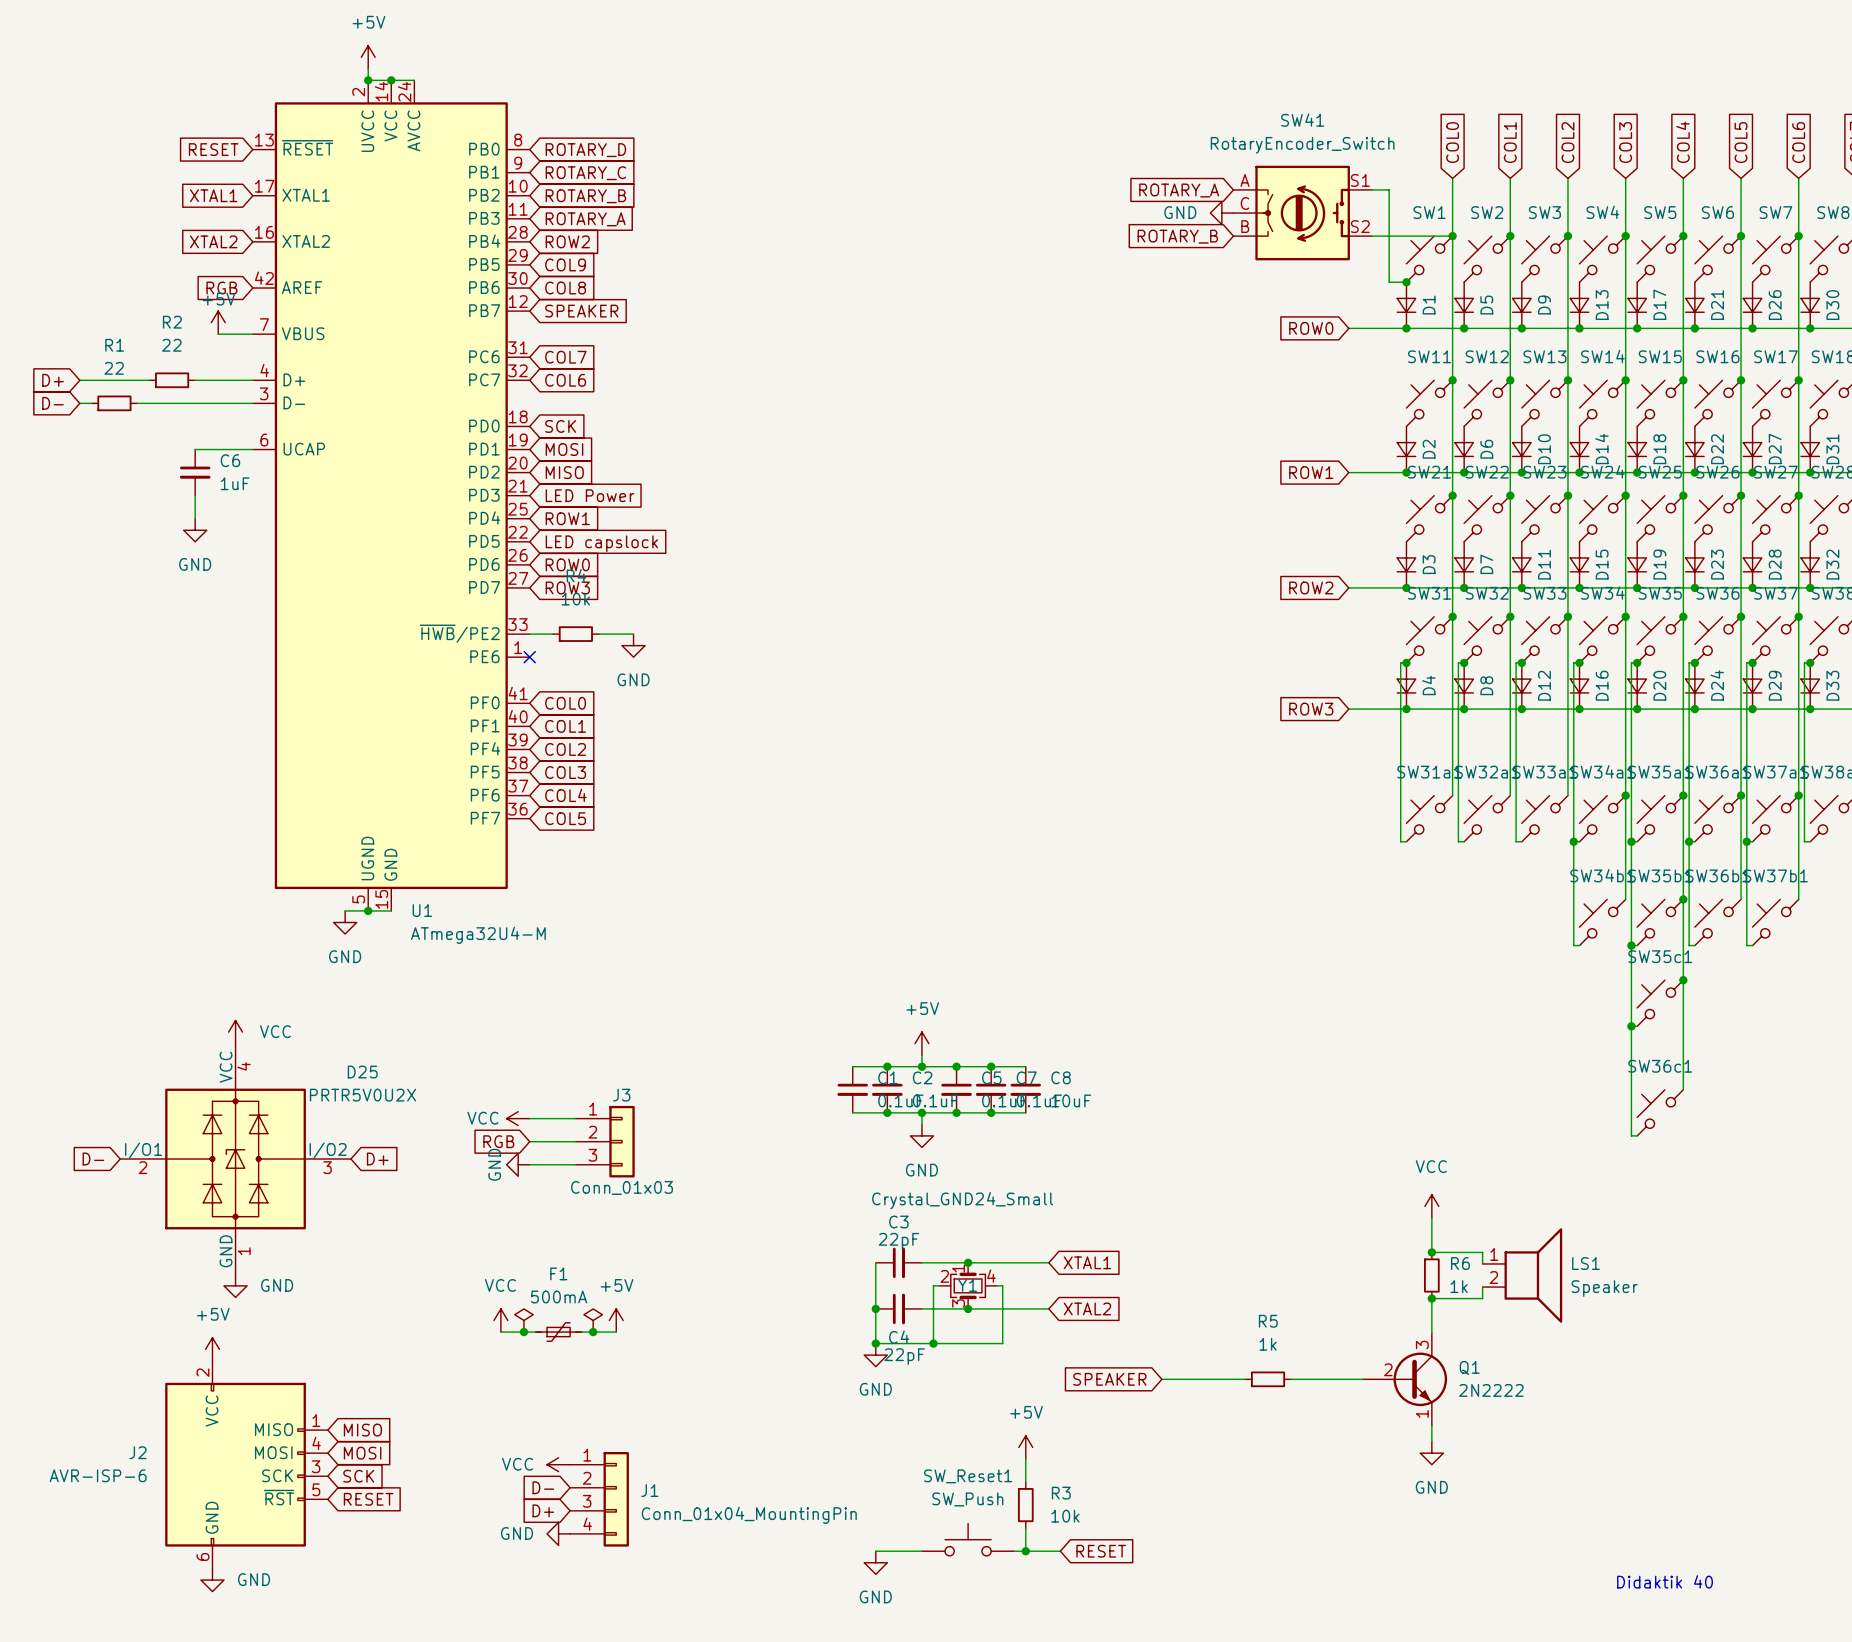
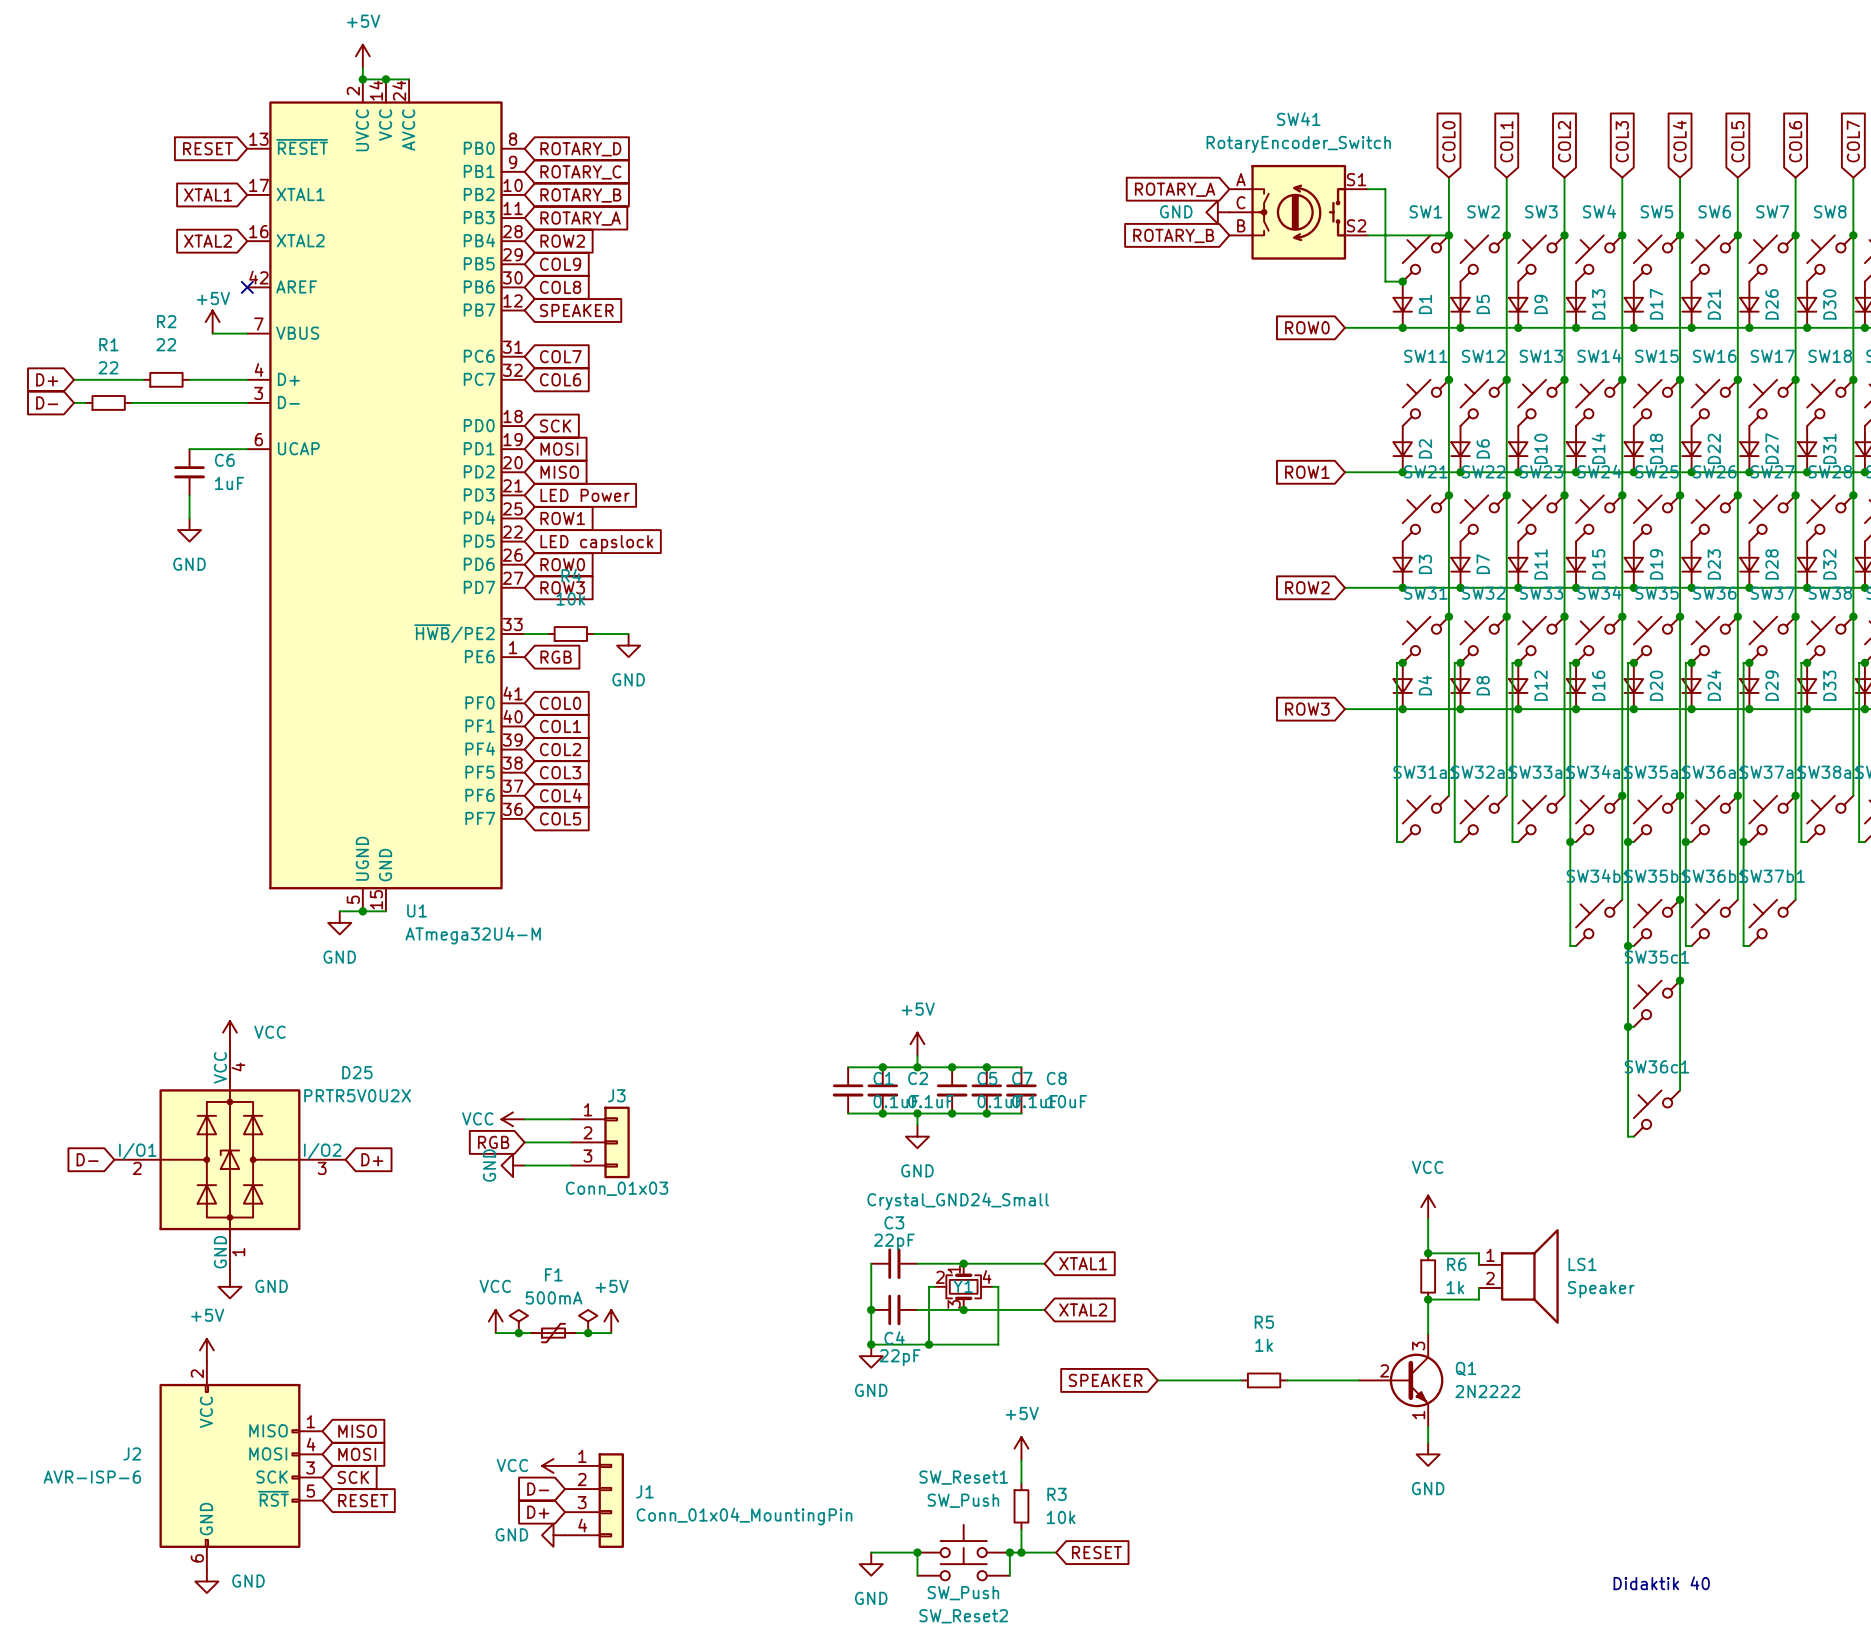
global label: RGB (221, 288) -> none
no-connect mark: none -> (247, 287)
no-connect mark: (529, 657) -> none
global label: none -> RGB (556, 657)
wire: none -> (917, 1552) (917, 1575)
junction: none -> (917, 1552)
wire: none -> (1009, 1552) (1009, 1575)
junction: none -> (1009, 1552)
SW_Reset2: none -> SW_Push (963, 1564)

